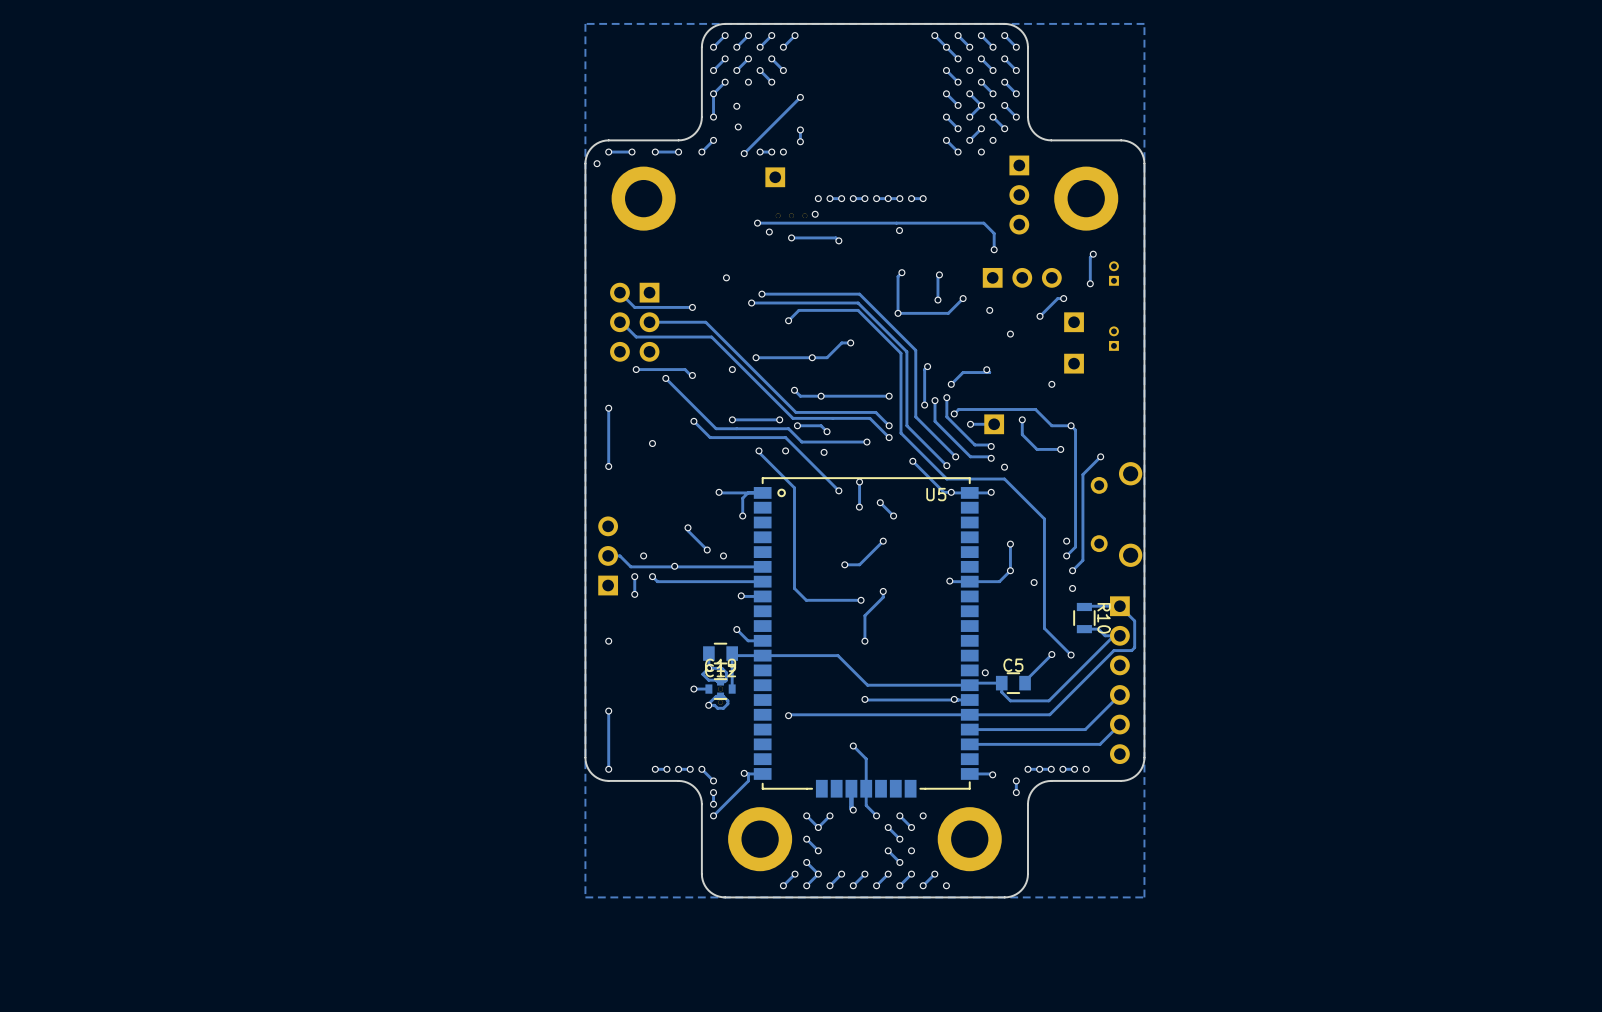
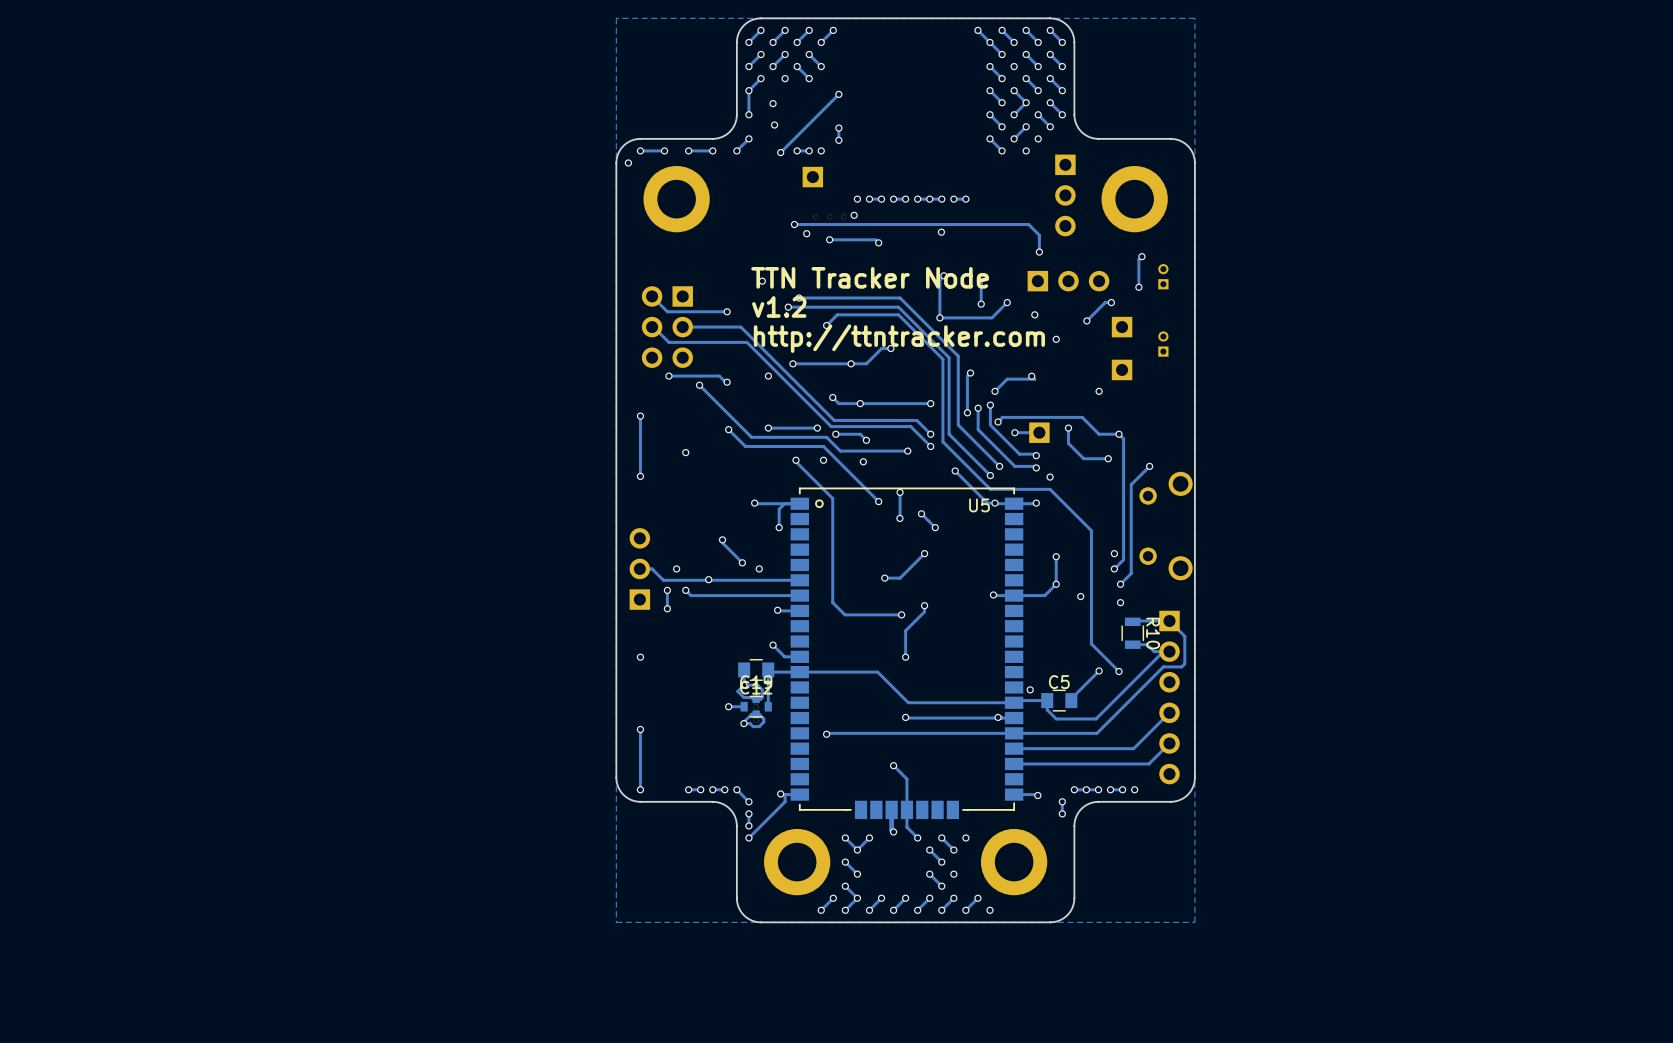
text: none -> TTN Tracker Node (870, 277)
text: none -> v1.2 (779, 306)
text: none -> http://ttntracker.com (899, 338)

